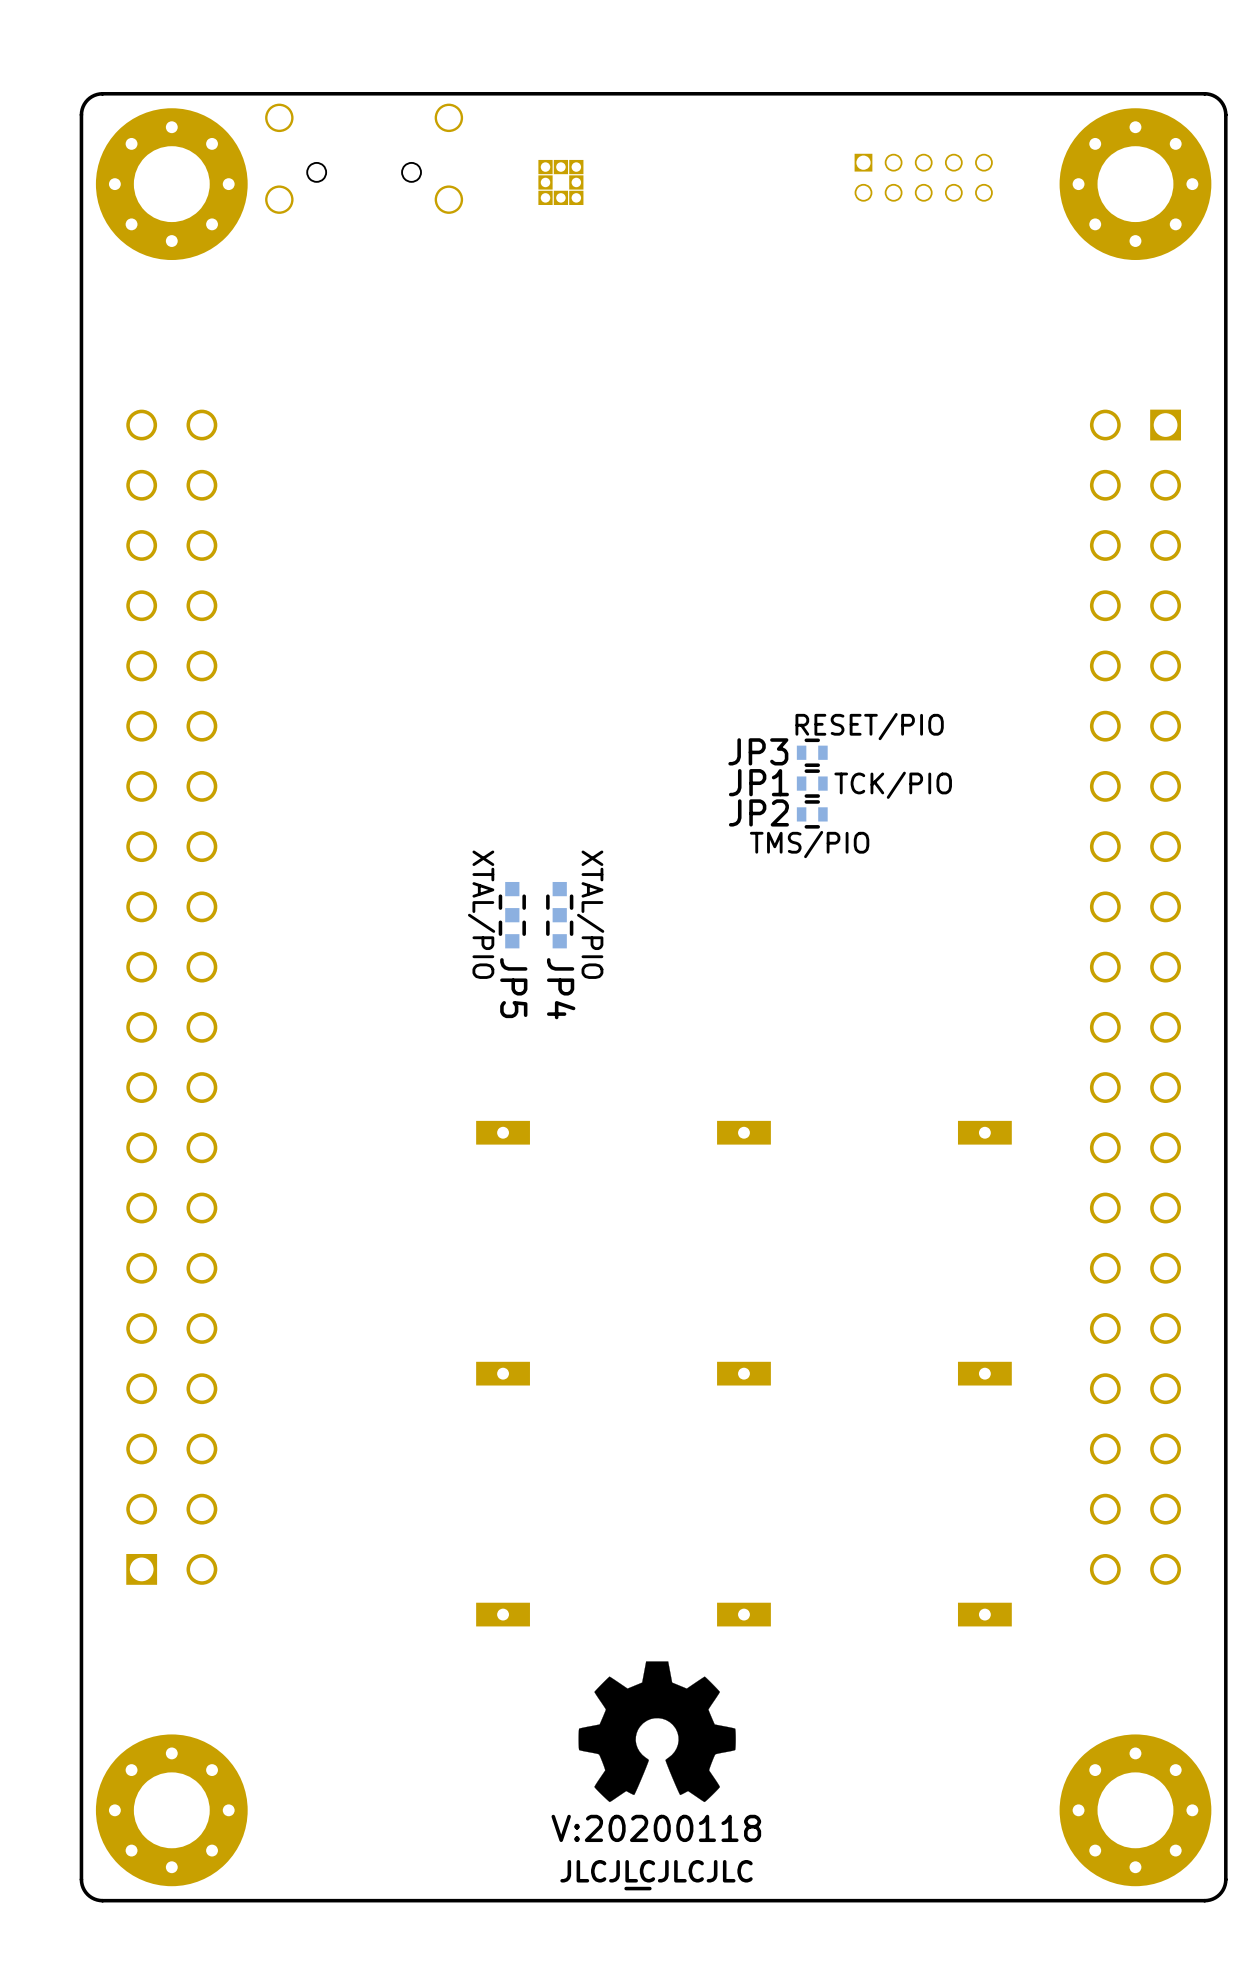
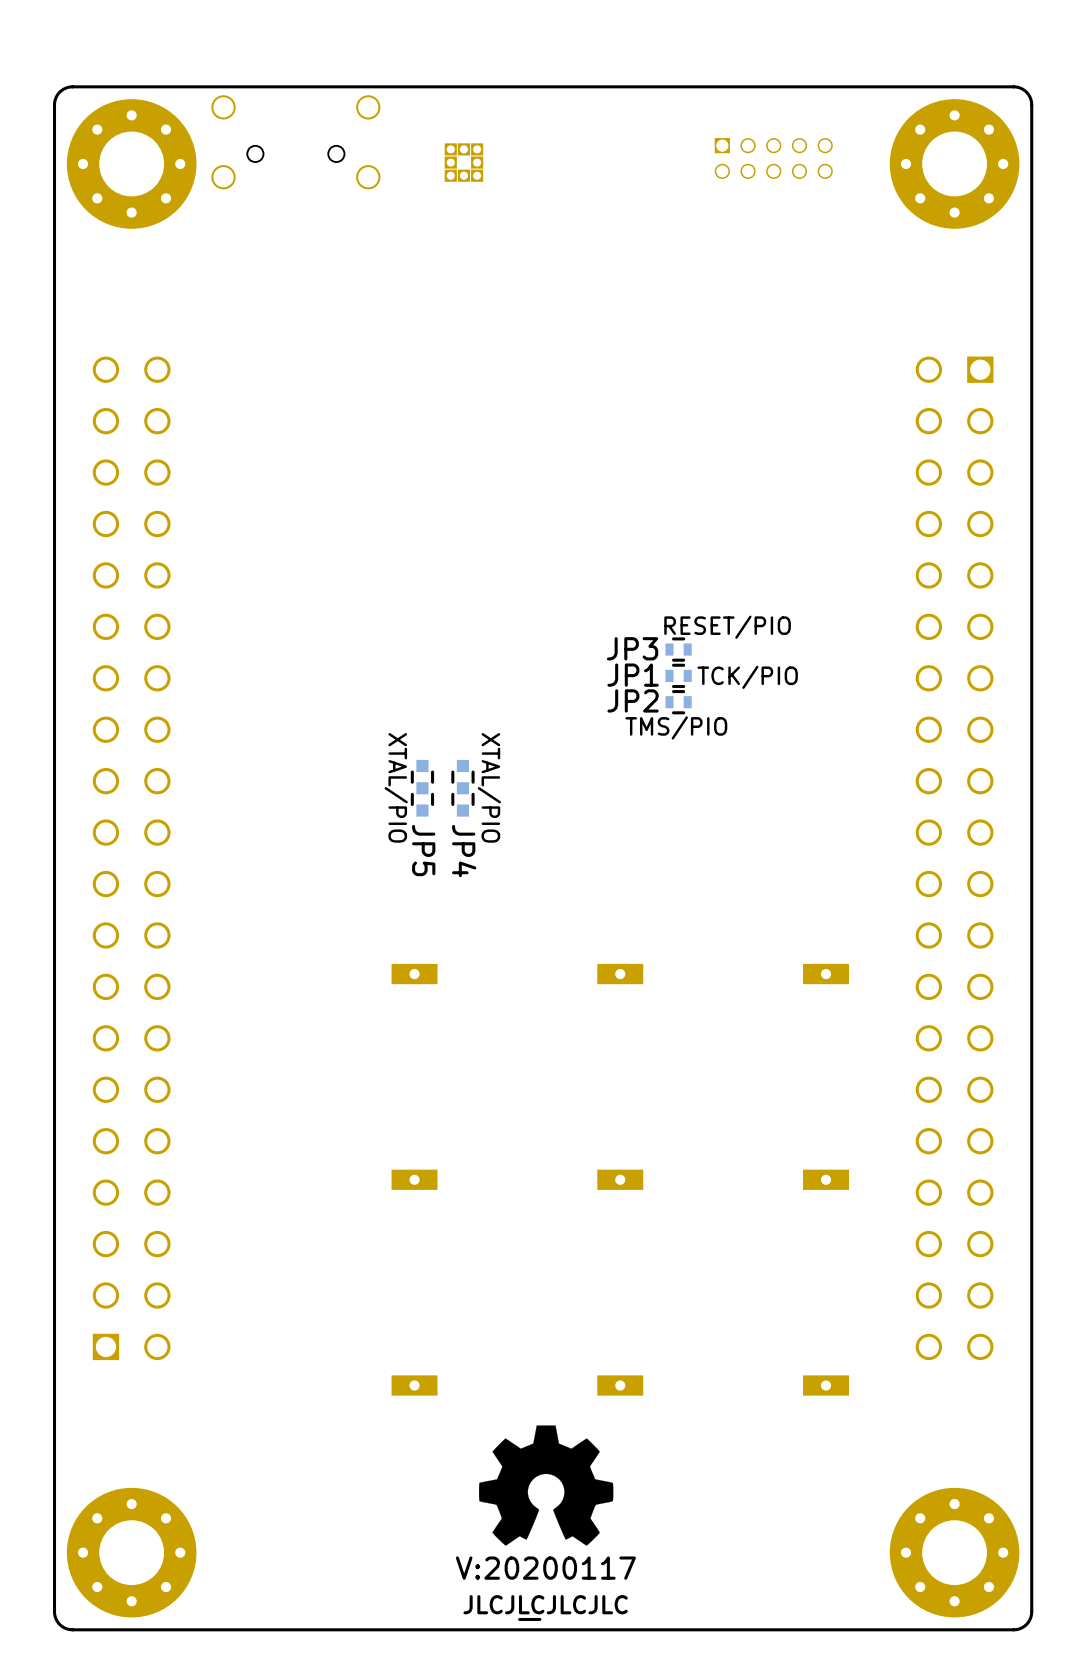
drawing shape: [551, 1814, 762, 1843] -> [455, 1556, 636, 1580]

